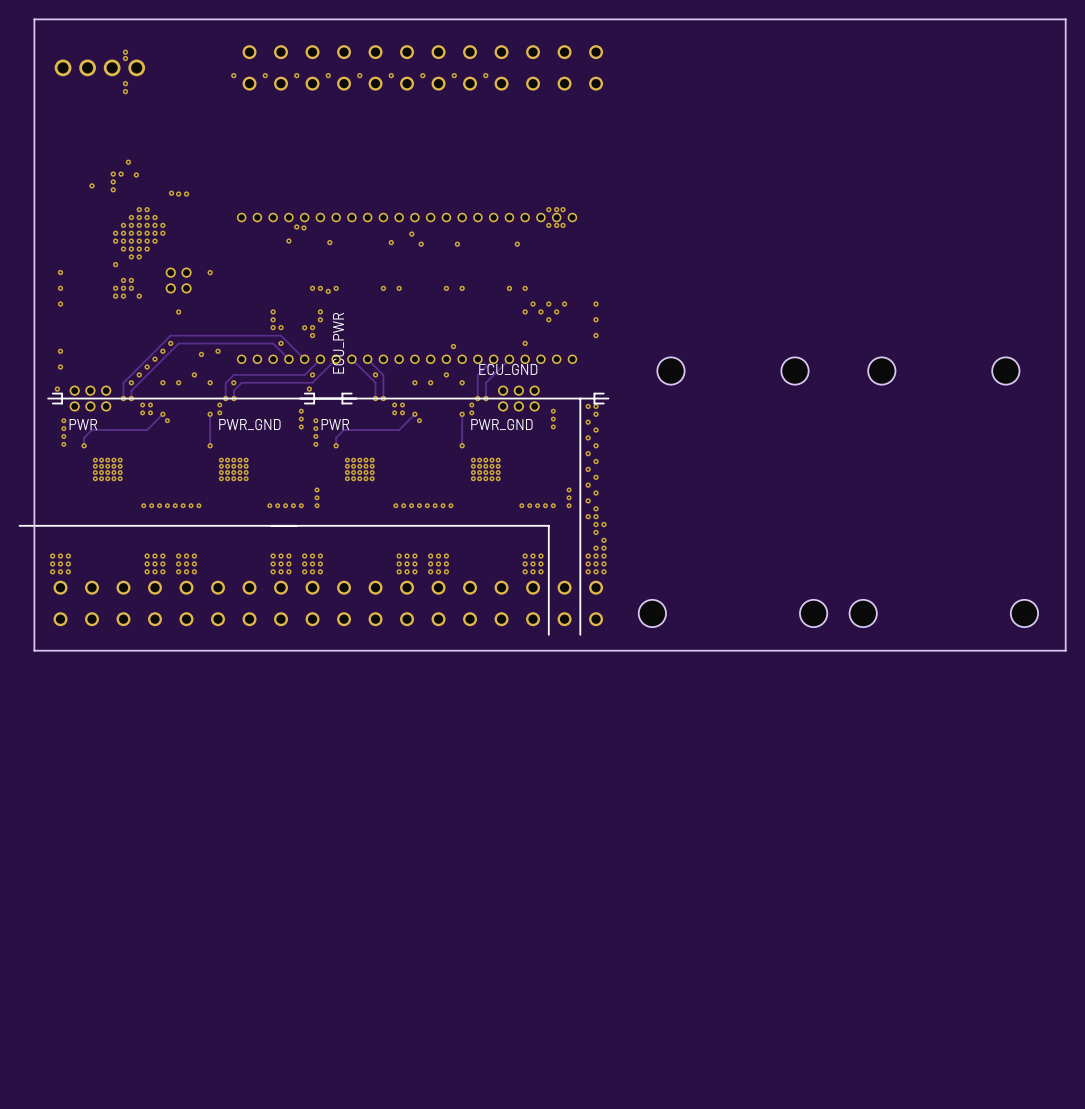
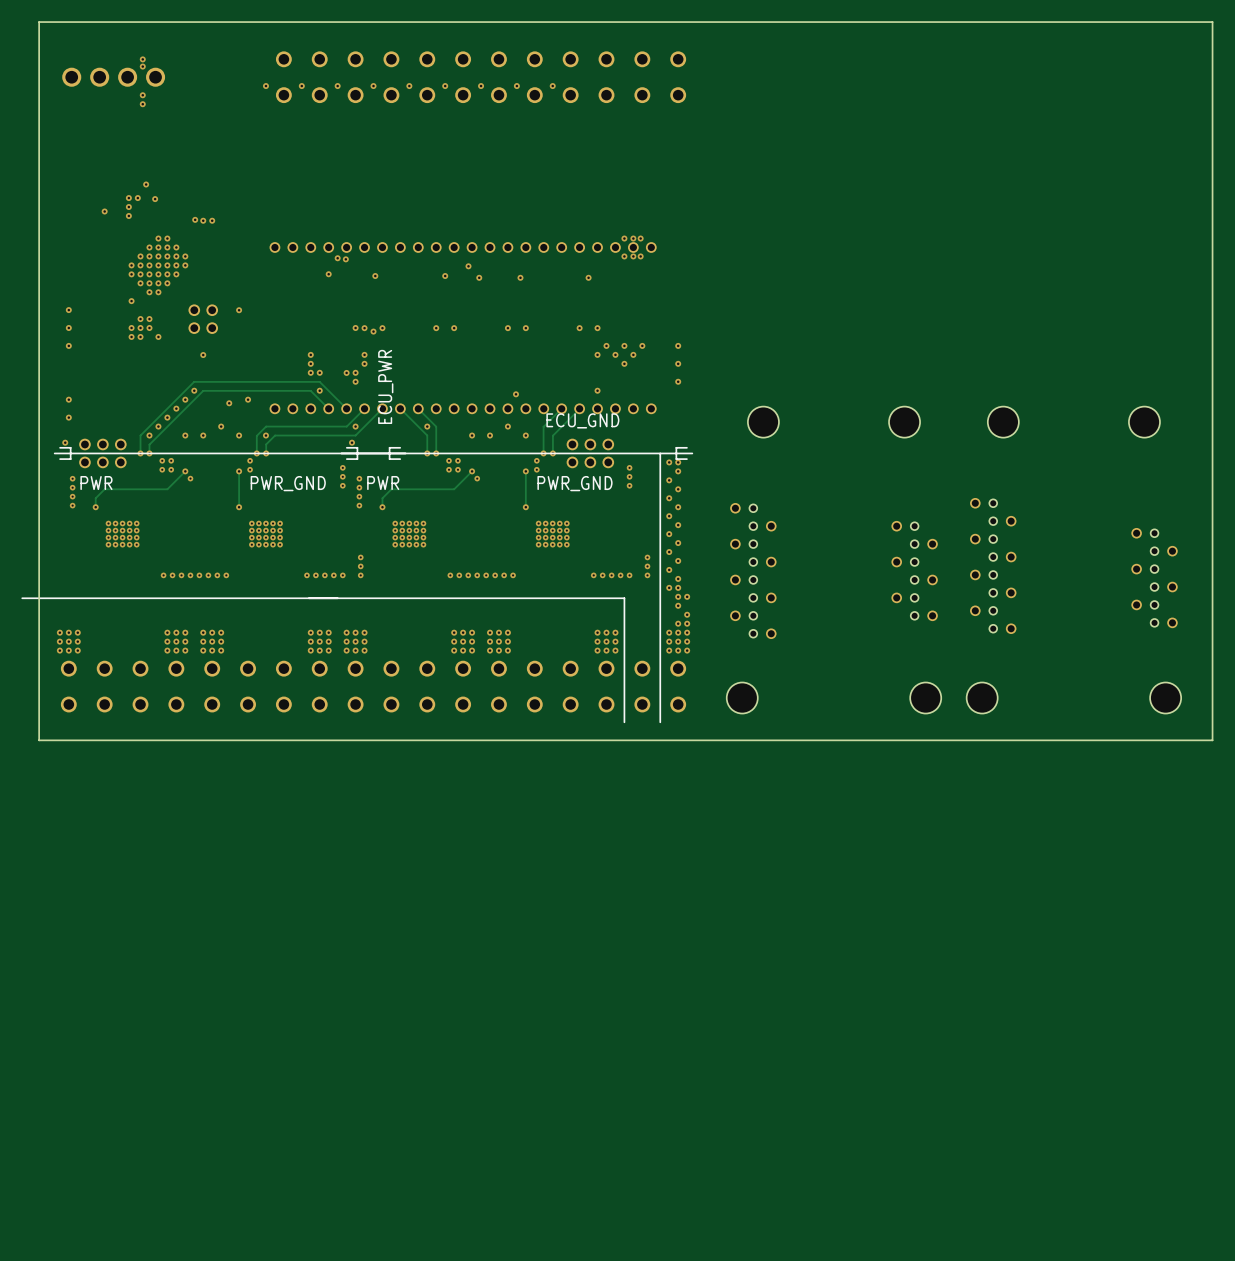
part: none -> (993, 566)
part: none -> (753, 571)
part: none -> (914, 571)
part: none -> (1154, 578)

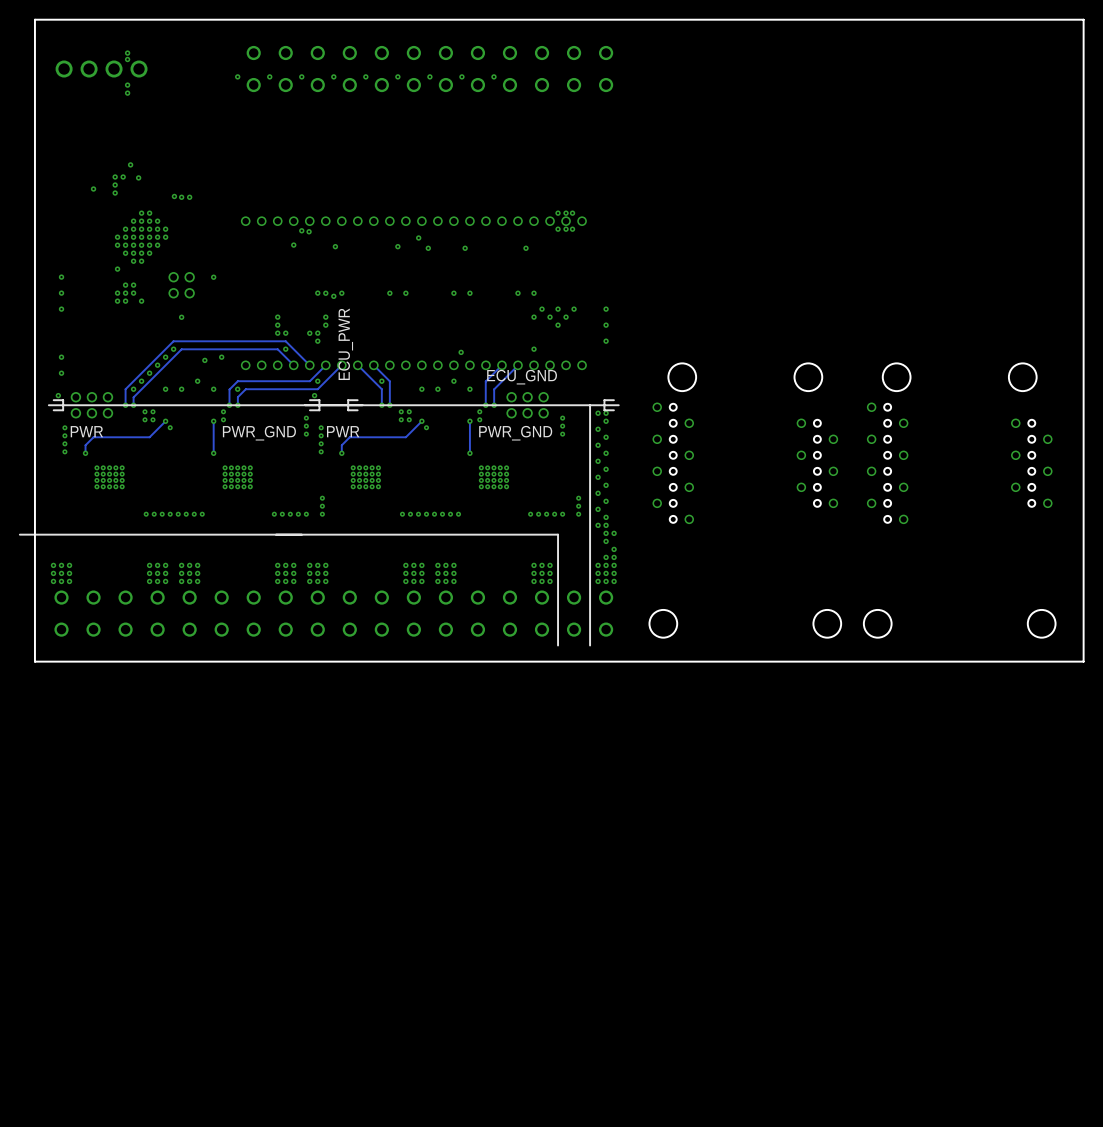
part position: (993, 566) -> (887, 463)
part position: (753, 571) -> (673, 463)
part position: (914, 571) -> (817, 463)
part position: (1154, 578) -> (1031, 463)

